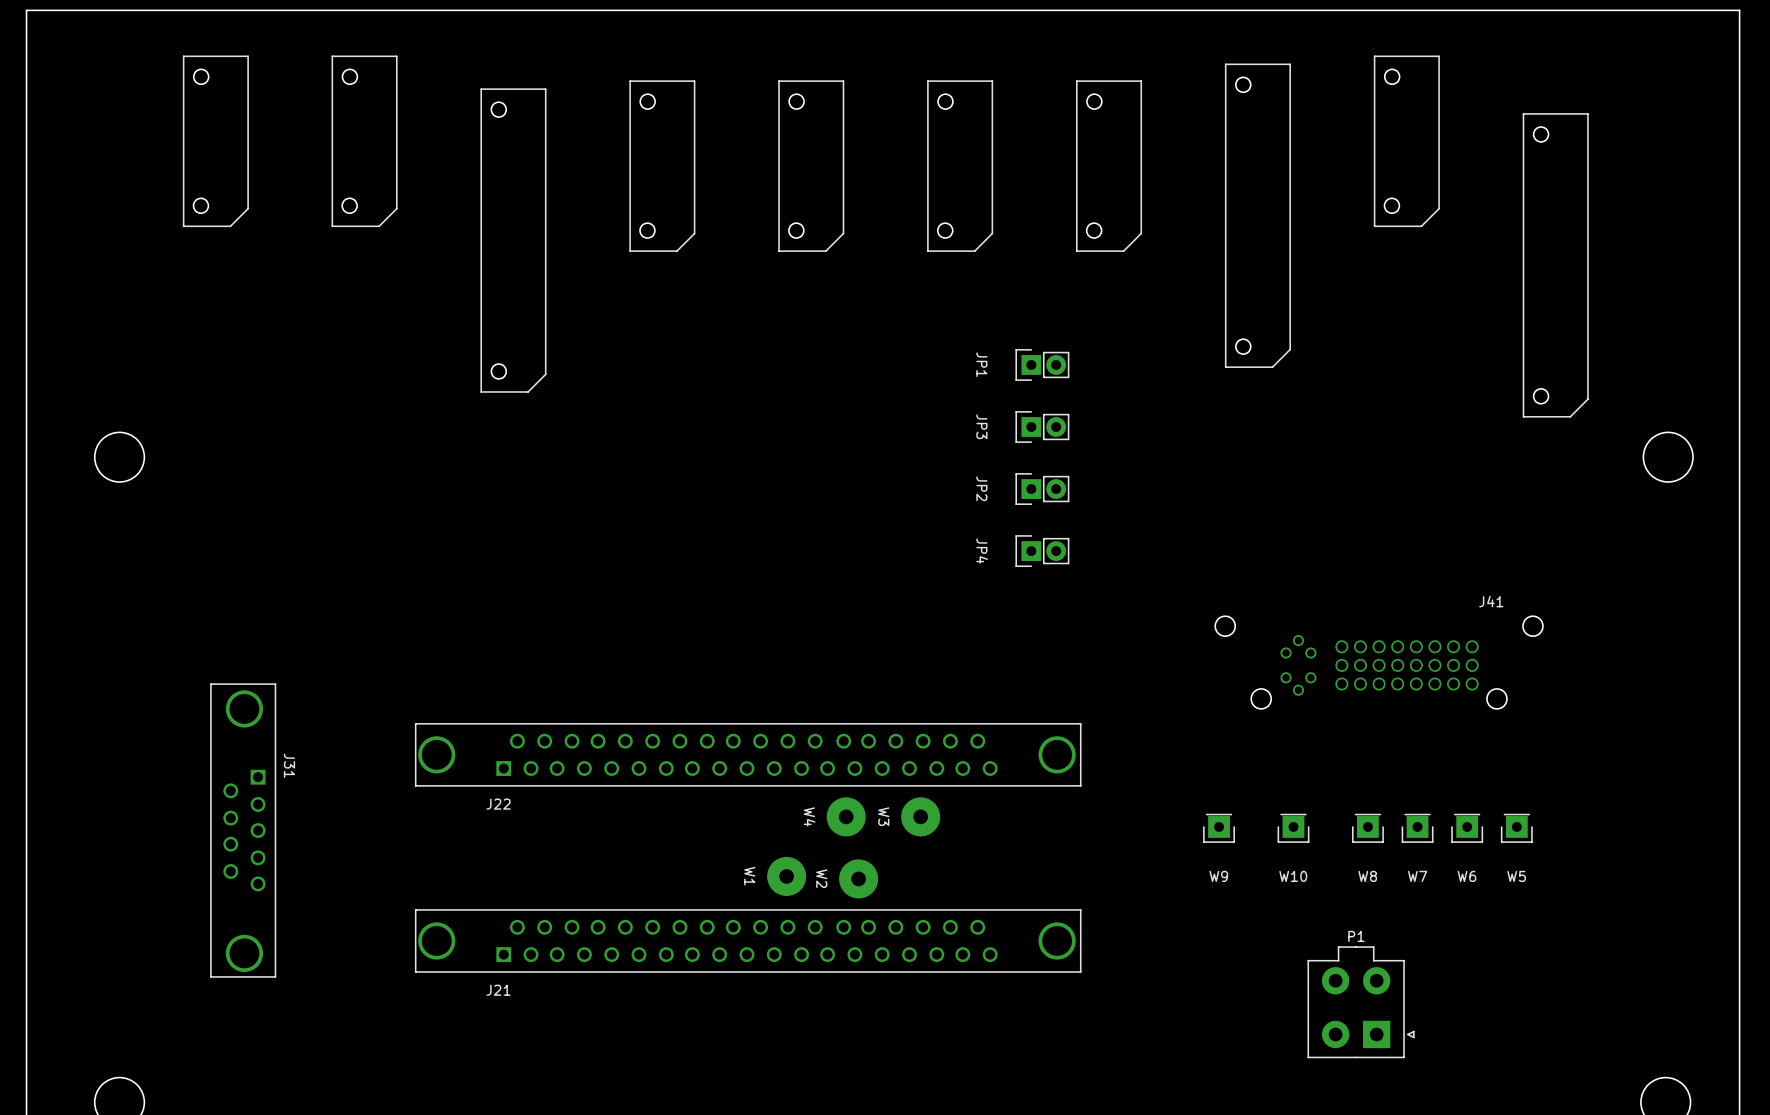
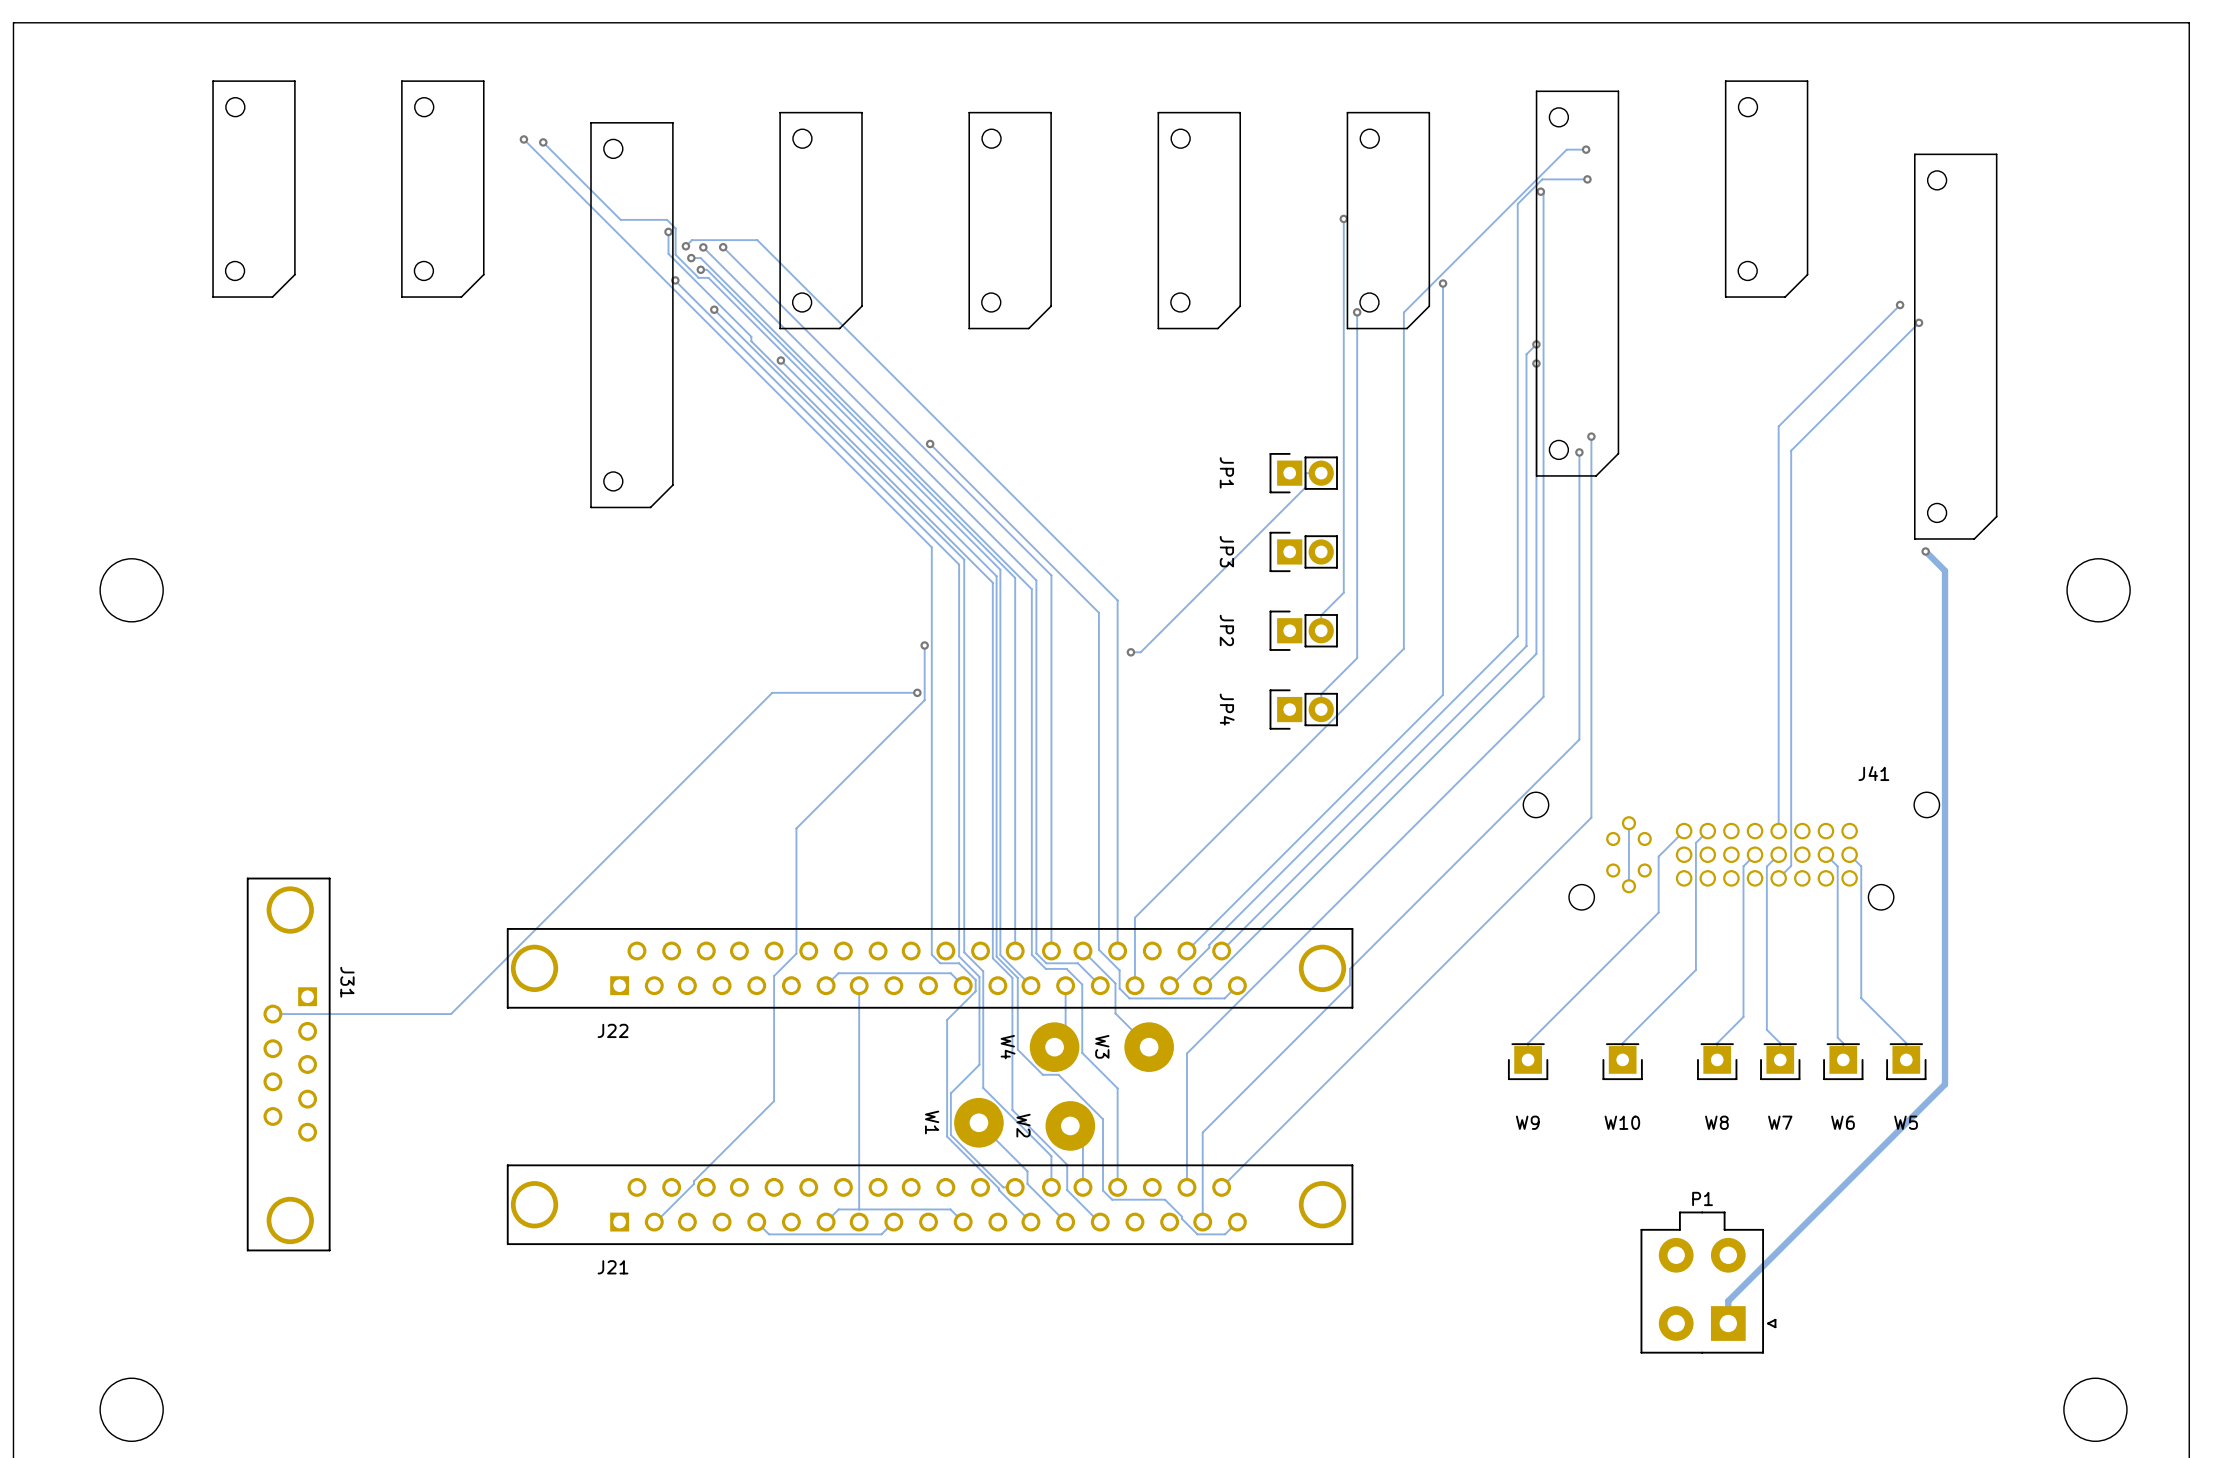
track: none -> (523, 139) (931, 547) (931, 954) (940, 963) (959, 963) (975, 979) (975, 991) (947, 1019) (947, 1136) (1030, 1222)
via: none -> (523, 139)
track: none -> (543, 142) (620, 219) (667, 219) (675, 228) (675, 254) (698, 277) (708, 277) (1000, 569) (1000, 955) (1030, 985)
via: none -> (543, 142)
track: none -> (1586, 149) (1566, 149) (1403, 312) (1403, 648) (1134, 917) (1134, 985)
via: none -> (1586, 149)
track: none -> (1587, 179) (1542, 179) (1517, 204) (1517, 636) (1169, 985)
via: none -> (1587, 179)
track: none -> (1540, 191) (1543, 194) (1543, 696) (1186, 1053) (1186, 1187)
via: none -> (1540, 191)
track: none -> (1343, 218) (1343, 592) (1321, 615) (1321, 630)
via: none -> (1343, 218)
track: none -> (668, 231) (668, 253) (751, 336) (751, 341) (992, 582) (992, 958) (1012, 977) (1012, 1110) (1067, 1164) (1067, 1190) (1100, 1222)
via: none -> (668, 231)
track: none -> (685, 246) (692, 240) (757, 240) (1117, 600) (1117, 951)
via: none -> (685, 246)
track: none -> (703, 247) (1036, 580) (1036, 953) (1046, 963) (1077, 963) (1100, 985)
via: none -> (703, 247)
track: none -> (723, 247) (1051, 575) (1051, 951)
via: none -> (723, 247)
track: none -> (691, 258) (700, 258) (1031, 589) (1031, 954) (1045, 968) (1066, 968) (1082, 984) (1082, 1052) (1117, 1088) (1117, 1187)
via: none -> (691, 258)
track: none -> (700, 269) (707, 269) (1015, 577) (1015, 951)
via: none -> (700, 269)
track: none -> (675, 280) (959, 564) (959, 956) (979, 976) (979, 1064) (950, 1093) (950, 1135) (1003, 1187) (1015, 1187)
via: none -> (675, 280)
track: none -> (1443, 283) (1443, 694) (1186, 951)
via: none -> (1443, 283)
track: none -> (1900, 305) (1778, 426) (1778, 831)
via: none -> (1900, 305)
track: none -> (714, 309) (964, 559) (964, 952) (983, 971) (983, 1087) (1051, 1156) (1051, 1187)
via: none -> (714, 309)
track: none -> (1357, 312) (1357, 658) (1321, 694) (1321, 709)
via: none -> (1357, 312)
track: none -> (1919, 322) (1791, 450) (1791, 865) (1778, 878)
via: none -> (1919, 322)
track: none -> (1536, 344) (1526, 354) (1526, 646) (1221, 951)
via: none -> (1536, 344)
track: none -> (780, 360) (996, 576) (996, 956) (1017, 977) (1017, 1049) (1042, 1074) (1058, 1074) (1103, 1119) (1103, 1190) (1112, 1199) (1165, 1199) (1197, 1234) (1225, 1234) (1237, 1222)
via: none -> (780, 360)
track: none -> (1536, 363) (1536, 653) (1202, 985)
via: none -> (1536, 363)
track: none -> (1591, 436) (1591, 817) (1221, 1187)
via: none -> (1591, 436)
track: none -> (930, 443) (1098, 612) (1098, 949) (1119, 970) (1119, 988) (1129, 998) (1224, 998) (1237, 985)
via: none -> (930, 443)
track: none -> (1579, 452) (1579, 739) (1349, 968) (1349, 985) (1202, 1132) (1202, 1222)
via: none -> (1579, 452)
track: none -> (1321, 473) (1305, 473) (1305, 487) (1140, 652) (1130, 652)
track: none -> (1925, 551) (1945, 570) (1945, 1084) (1728, 1301) (1728, 1323)
via: none -> (1925, 551)
track: none -> (924, 645) (924, 700) (796, 828) (796, 953) (774, 976) (774, 1101) (654, 1222)
via: none -> (924, 645)
via: none -> (1130, 652)
track: none -> (917, 692) (772, 692) (451, 1014) (272, 1014)
via: none -> (917, 692)
track: none -> (1628, 823) (1628, 886)
track: none -> (1684, 831) (1658, 856) (1658, 912) (1528, 1043) (1528, 1059)
track: none -> (1707, 831) (1695, 842) (1695, 969) (1622, 1043) (1622, 1059)
track: none -> (1755, 854) (1743, 866) (1743, 1016) (1717, 1043) (1717, 1059)
track: none -> (1778, 854) (1766, 866) (1766, 1029) (1780, 1043) (1780, 1059)
track: none -> (1825, 854) (1837, 866) (1837, 1037) (1843, 1043) (1843, 1059)
track: none -> (1849, 854) (1861, 866) (1861, 998) (1906, 1043) (1906, 1059)
track: none -> (1083, 951) (1115, 983) (1115, 1013) (1149, 1047)
track: none -> (859, 985) (859, 1209)
track: none -> (963, 985) (950, 973) (838, 973) (826, 985)
track: none -> (1065, 985) (1065, 1036) (1054, 1047)
track: none -> (978, 1122) (1027, 1171) (1027, 1183) (1065, 1222)
track: none -> (1070, 1125) (1082, 1138) (1082, 1187)
track: none -> (893, 1222) (881, 1234) (769, 1234) (756, 1222)
track: none -> (963, 1222) (950, 1209) (838, 1209) (826, 1222)

